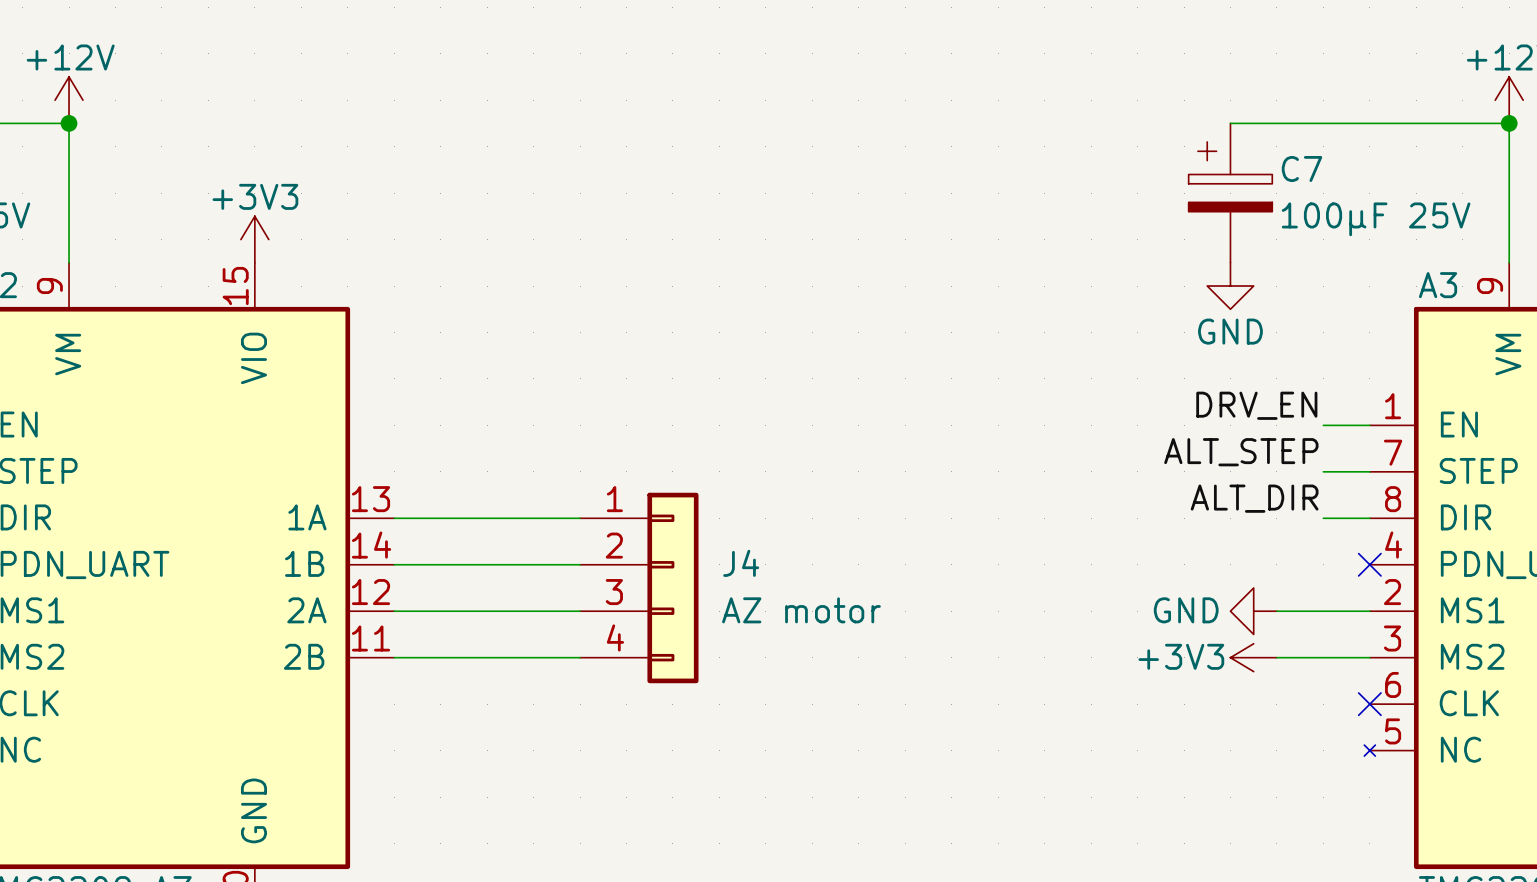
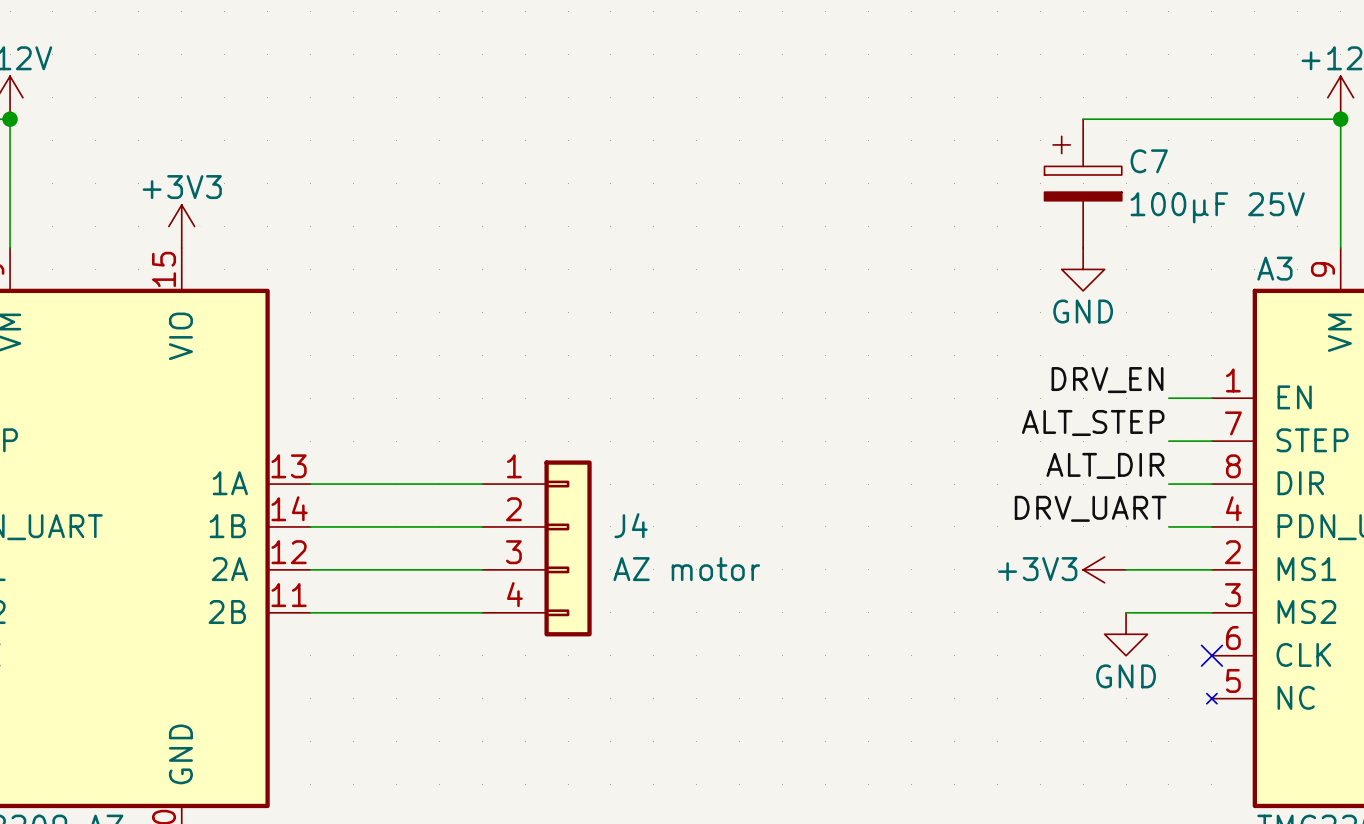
label: none -> DRV_UART (1090, 508)
wire: none -> (1168, 526) (1211, 526)
no-connect mark: (1369, 564) -> none
power symbol: GND (1253, 611) -> +3V3 (1104, 569)
power symbol: +3V3 (1253, 657) -> none
power symbol: none -> GND (1126, 634)

